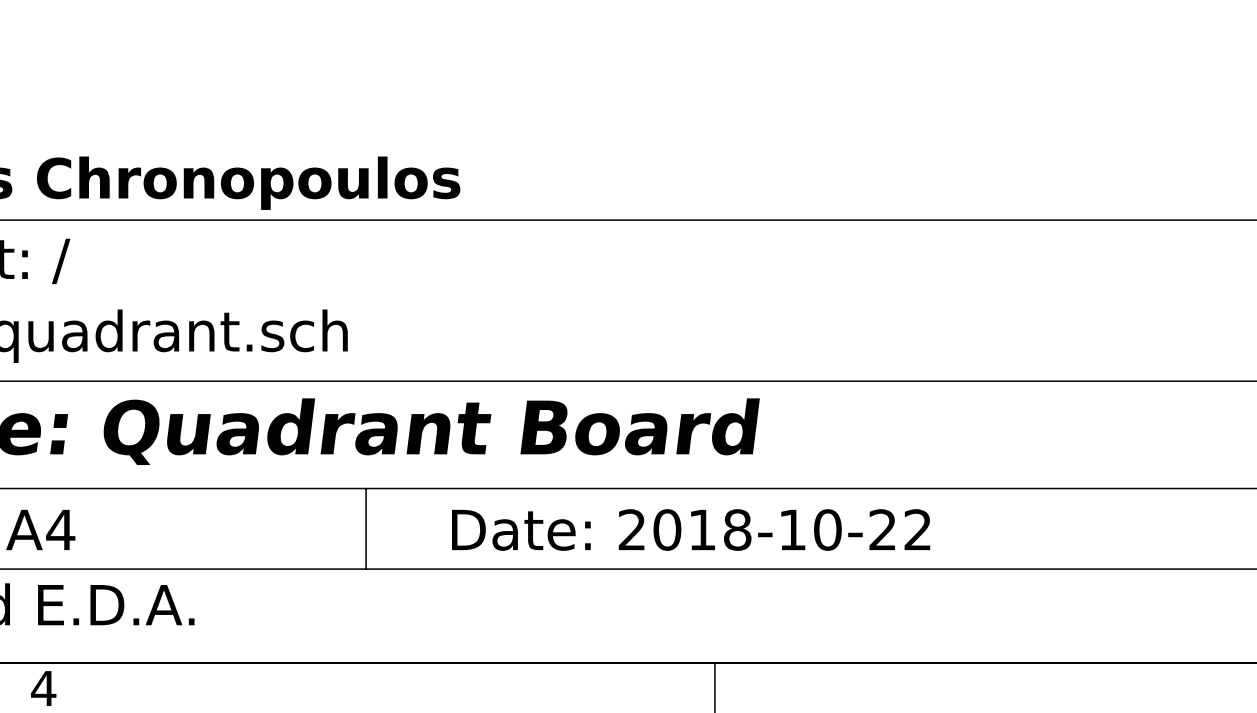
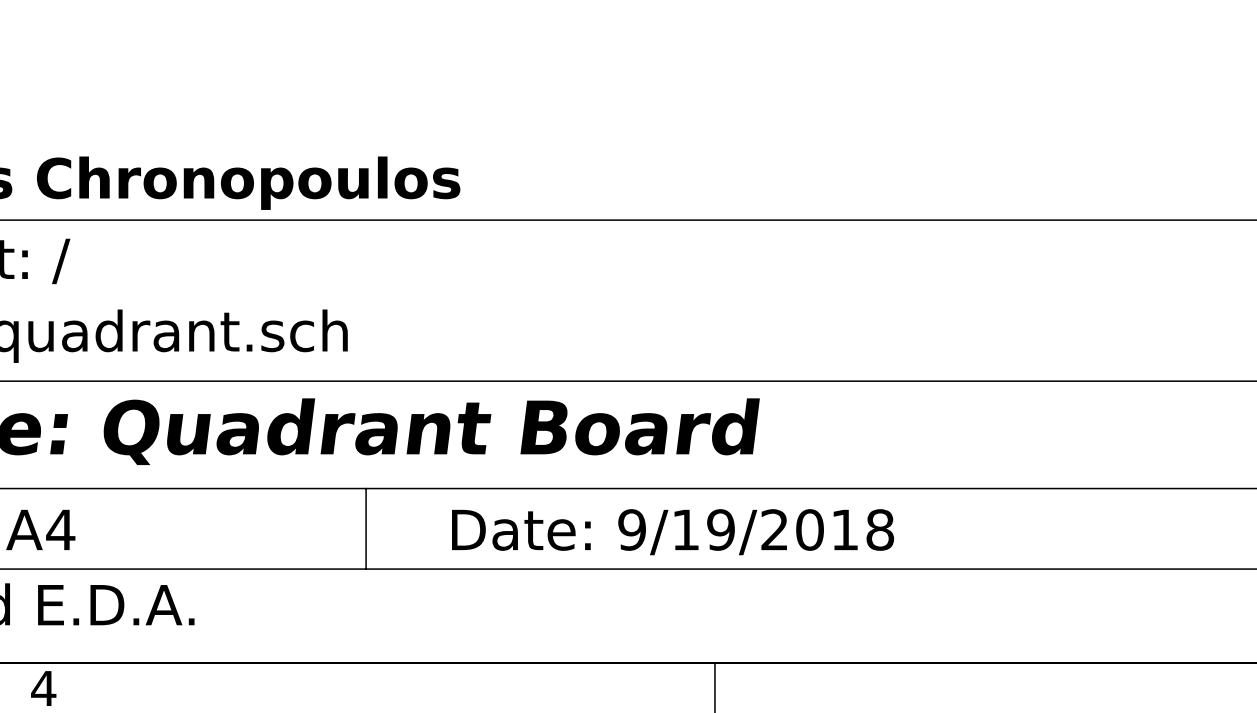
title block: Date: 2018-10-22 (691, 530) -> Date: 9/19/2018 (673, 532)

